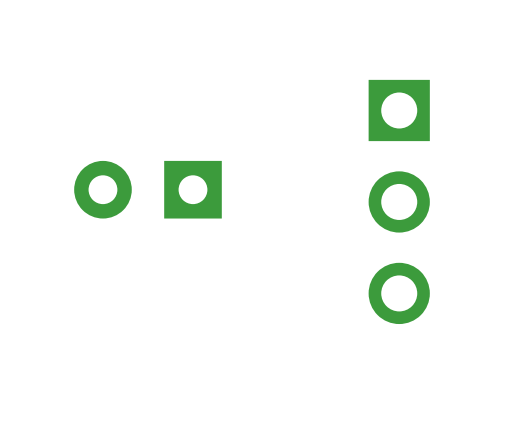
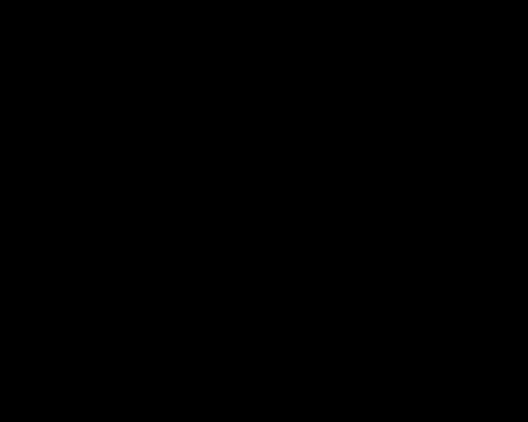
part: (147, 189) -> none
part: (399, 201) -> none

